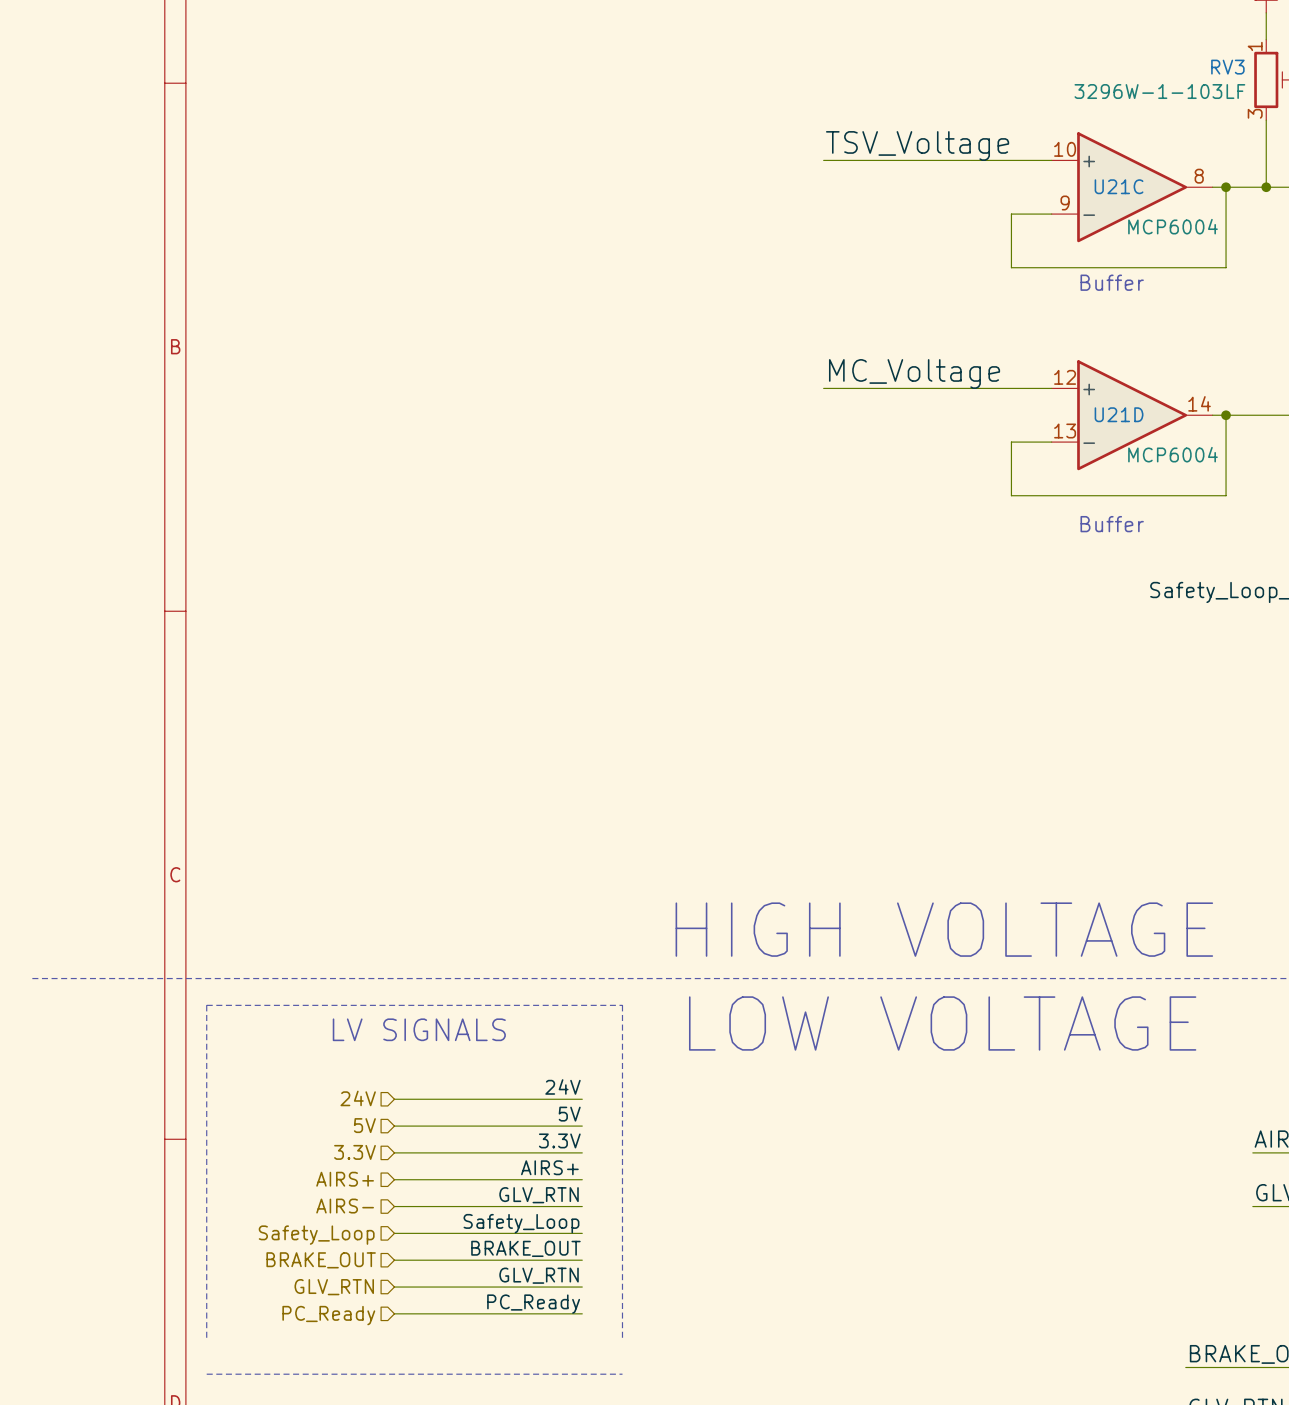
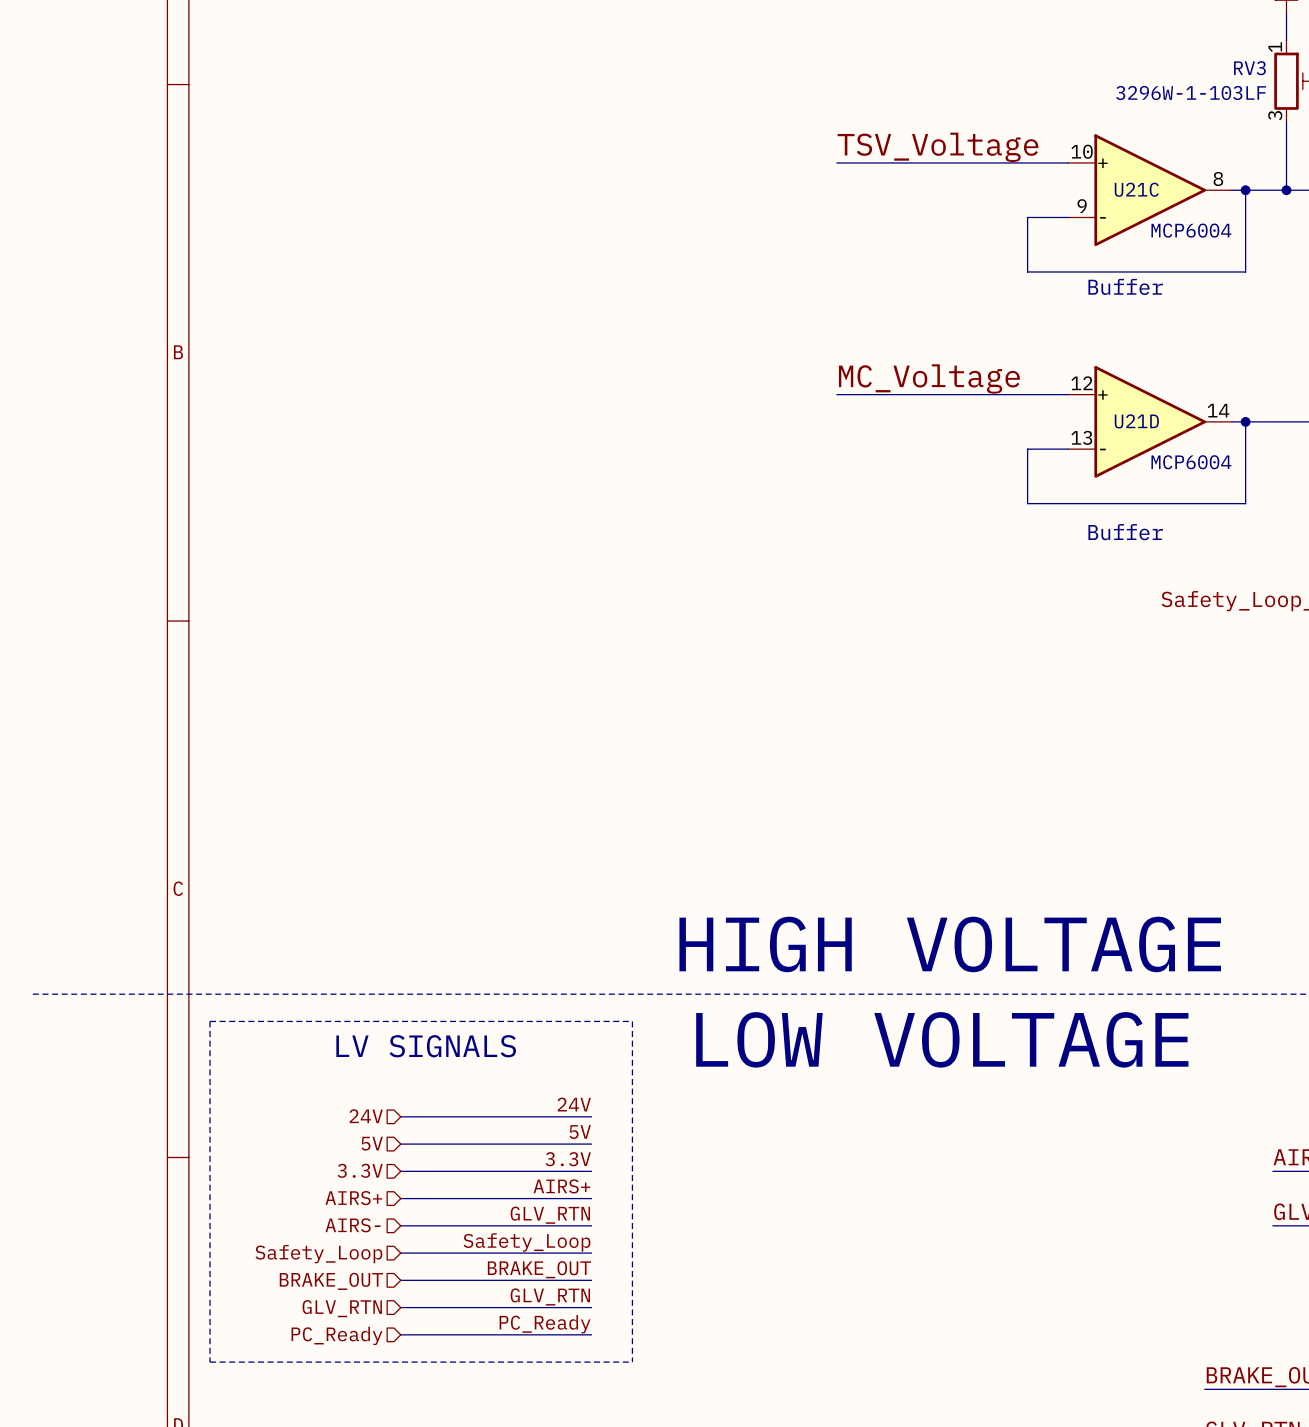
line: (206, 1374) (622, 1374) -> (210, 1362) (632, 1362)

